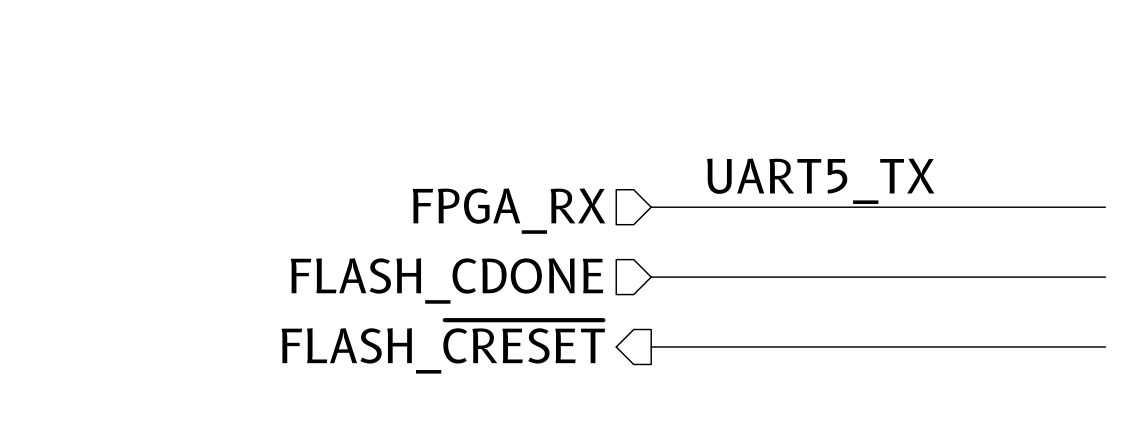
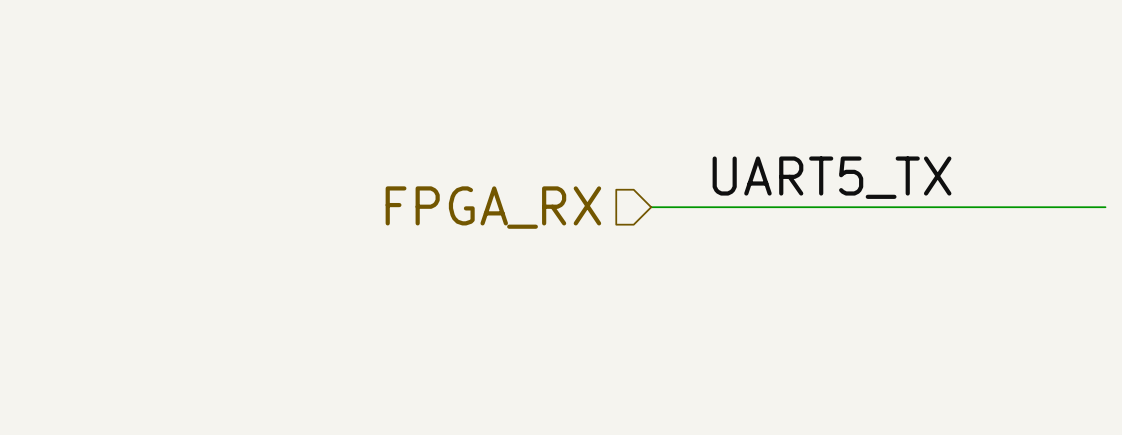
wire: (651, 277) (1105, 277) -> none
hierarchical label: FLASH_CDONE (447, 281) -> none
hierarchical label: FLASH_~{CRESET} (443, 346) -> none
wire: (651, 346) (1105, 346) -> none

